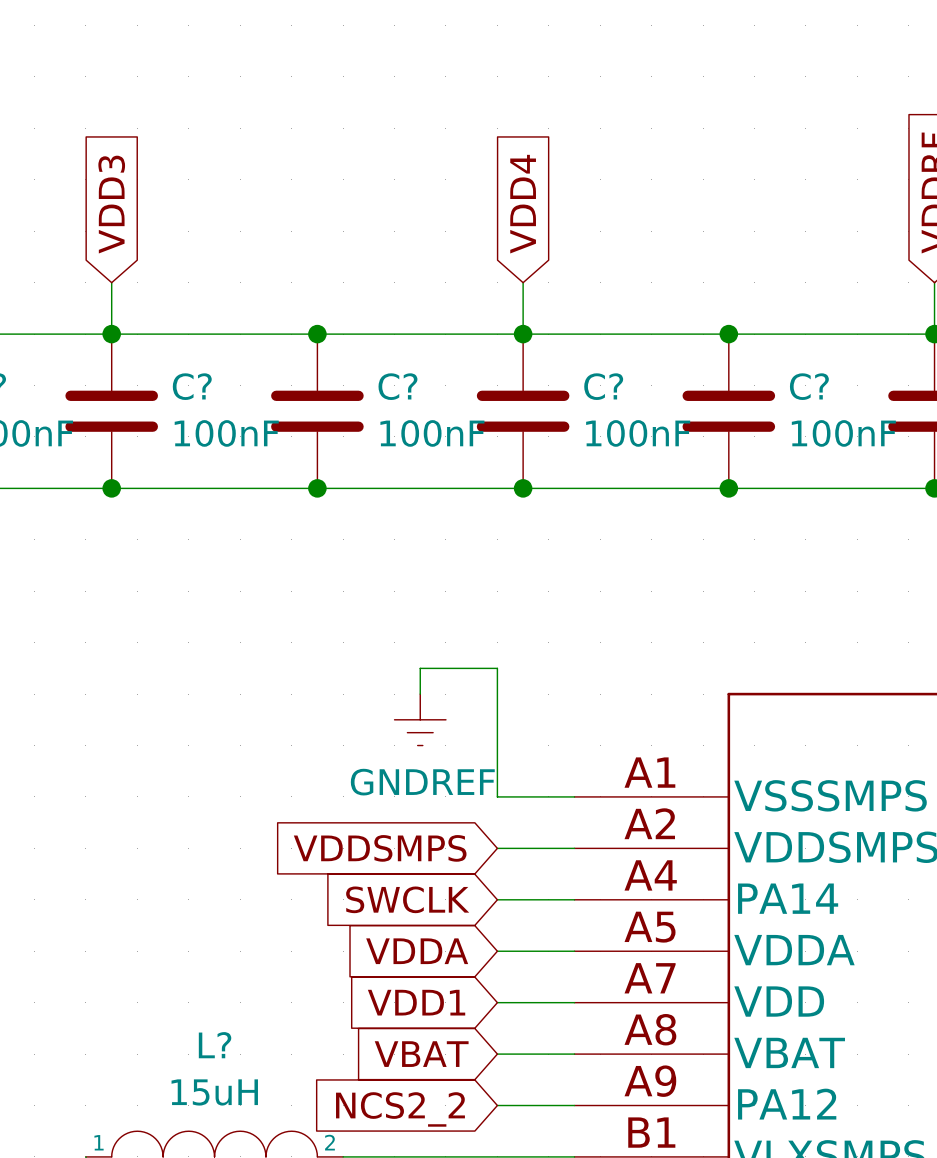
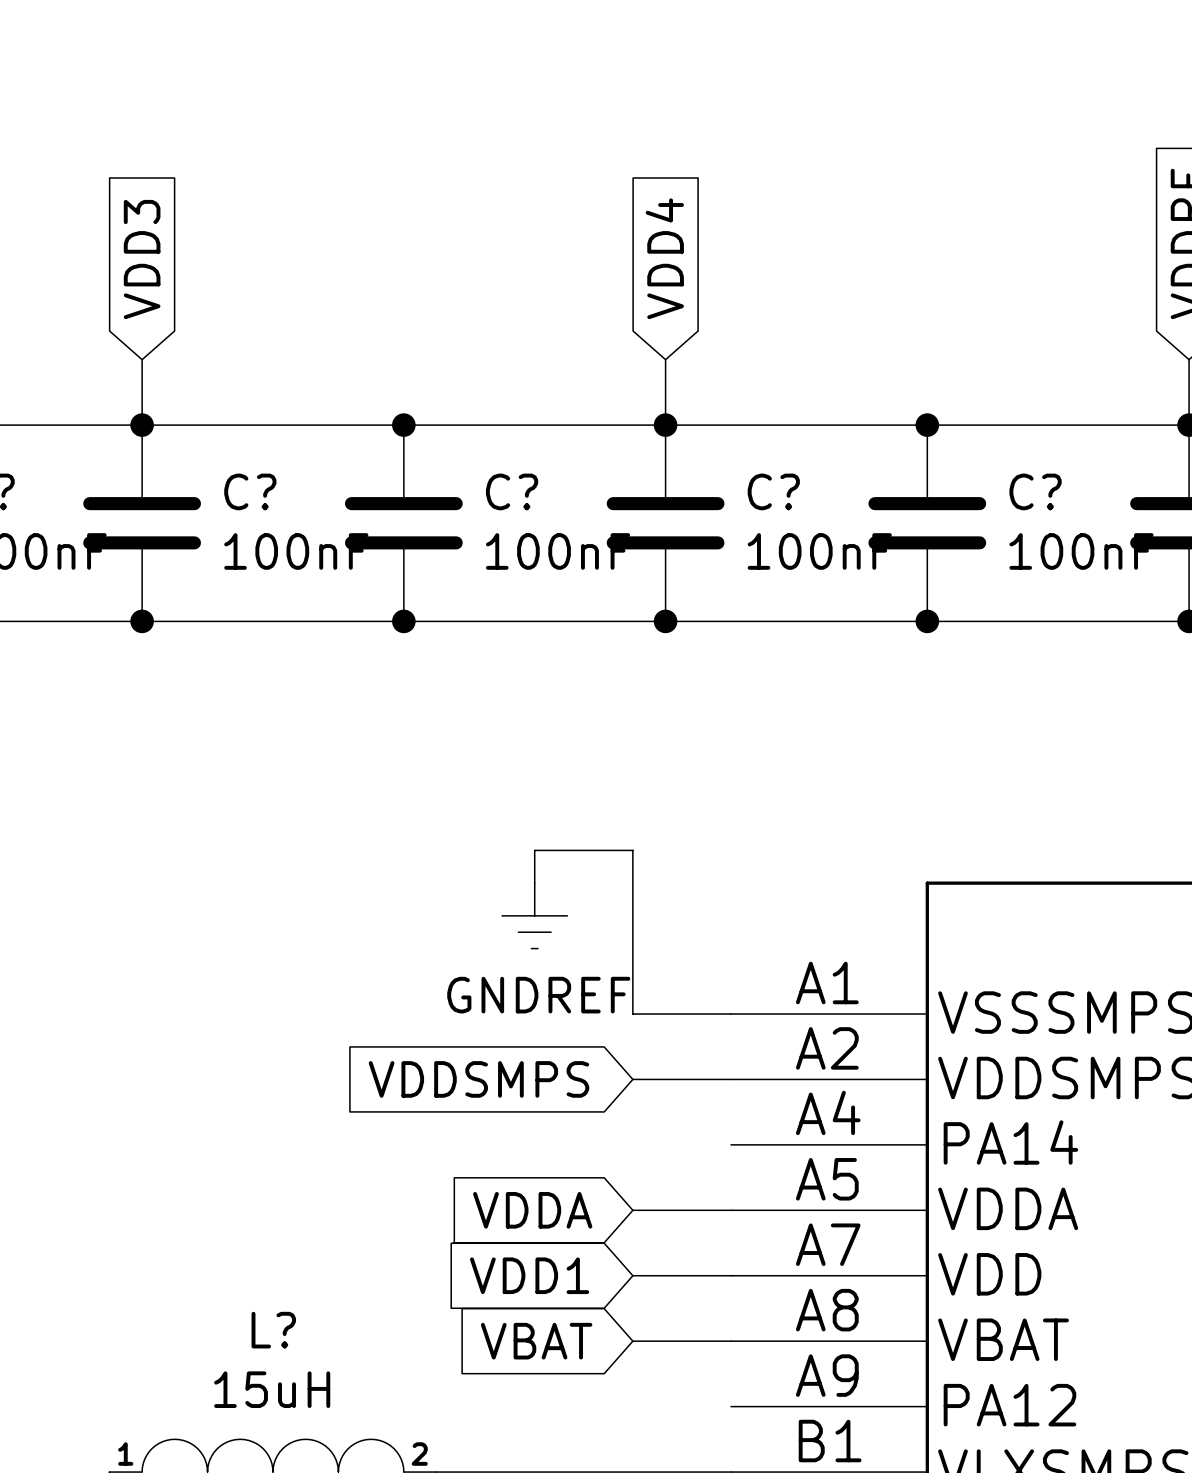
global label: SWCLK (407, 899) -> none
wire: (497, 899) (574, 899) -> none
wire: (497, 1105) (574, 1105) -> none
global label: NCS2_2 (400, 1109) -> none

